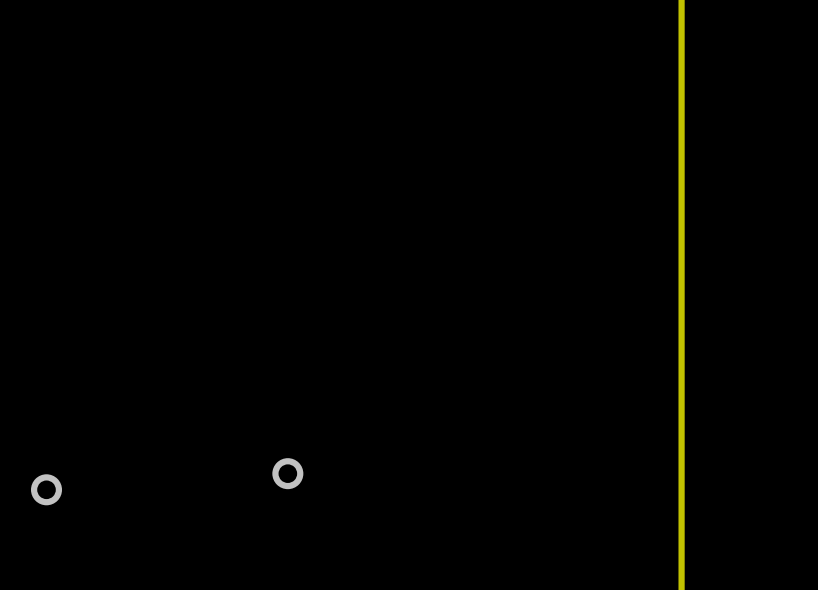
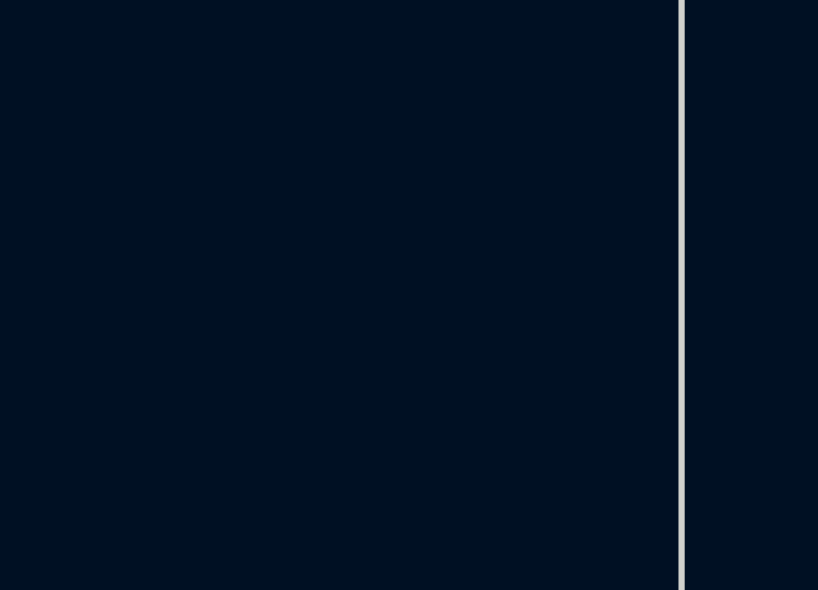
via: (287, 473) -> none
via: (46, 489) -> none

